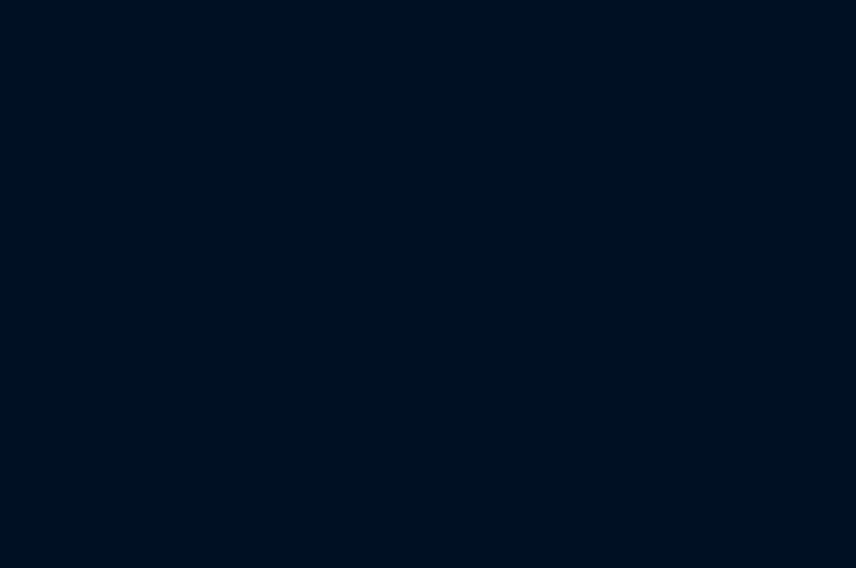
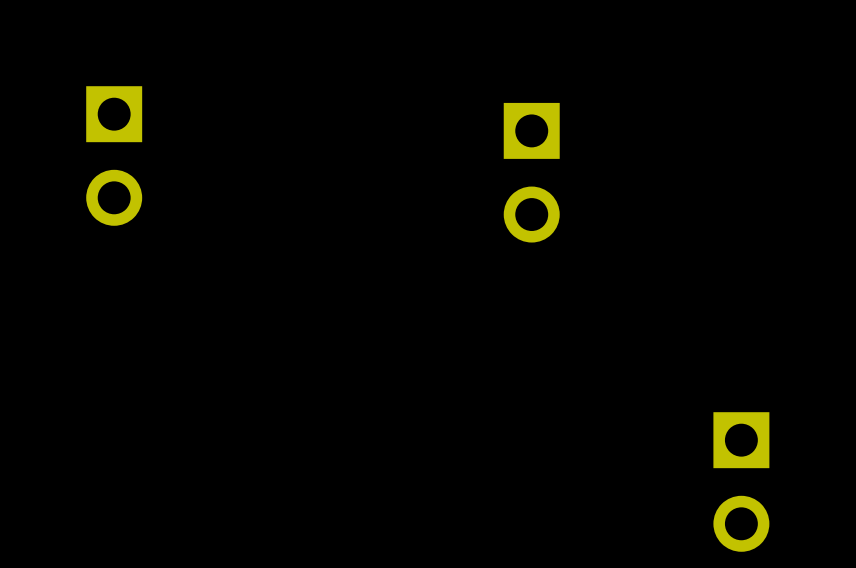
part: none -> (114, 156)
part: none -> (531, 172)
part: none -> (741, 481)

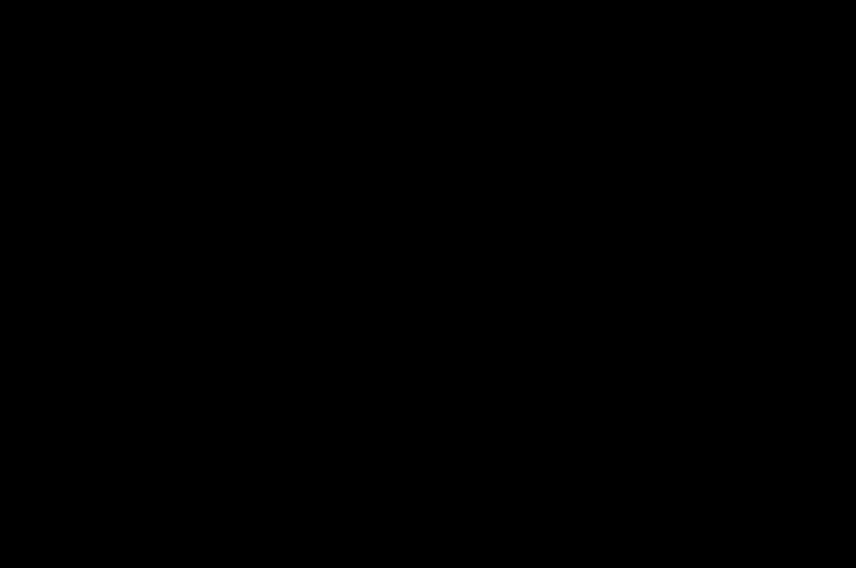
part: (114, 156) -> none
part: (531, 172) -> none
part: (741, 481) -> none

